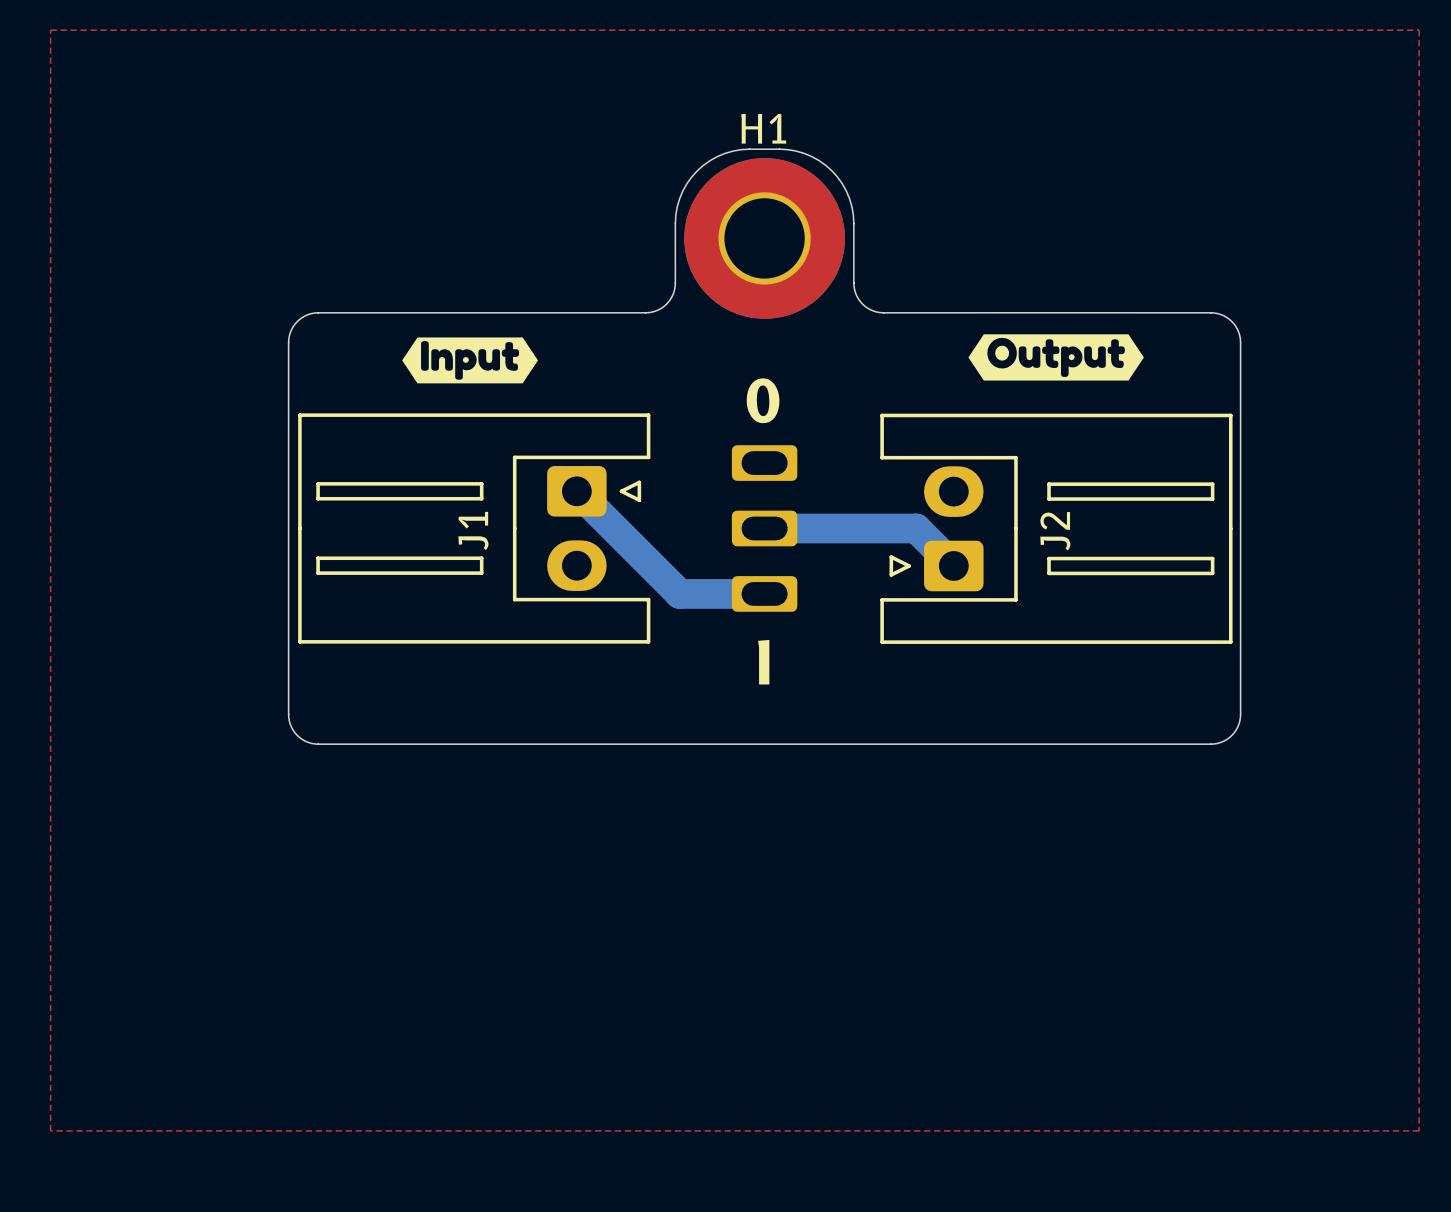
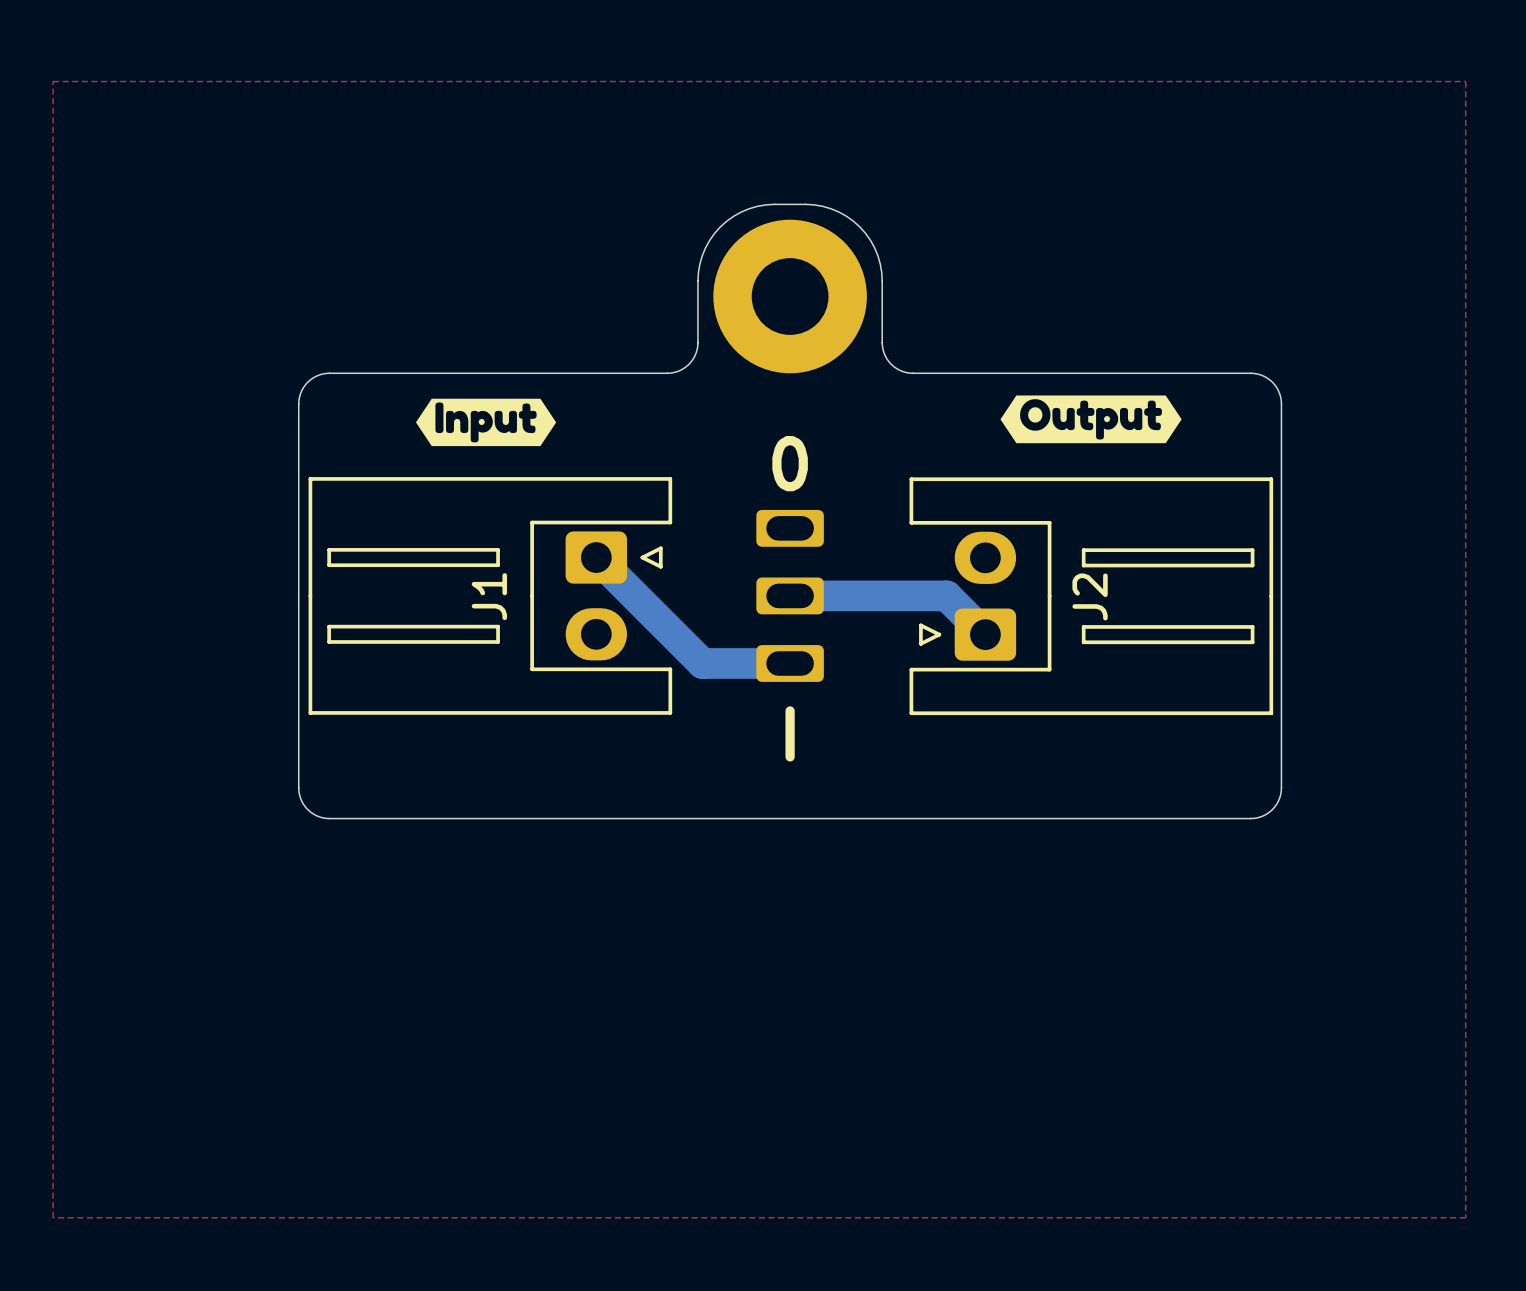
H1: (764, 238) -> none
part: none -> (790, 296)

